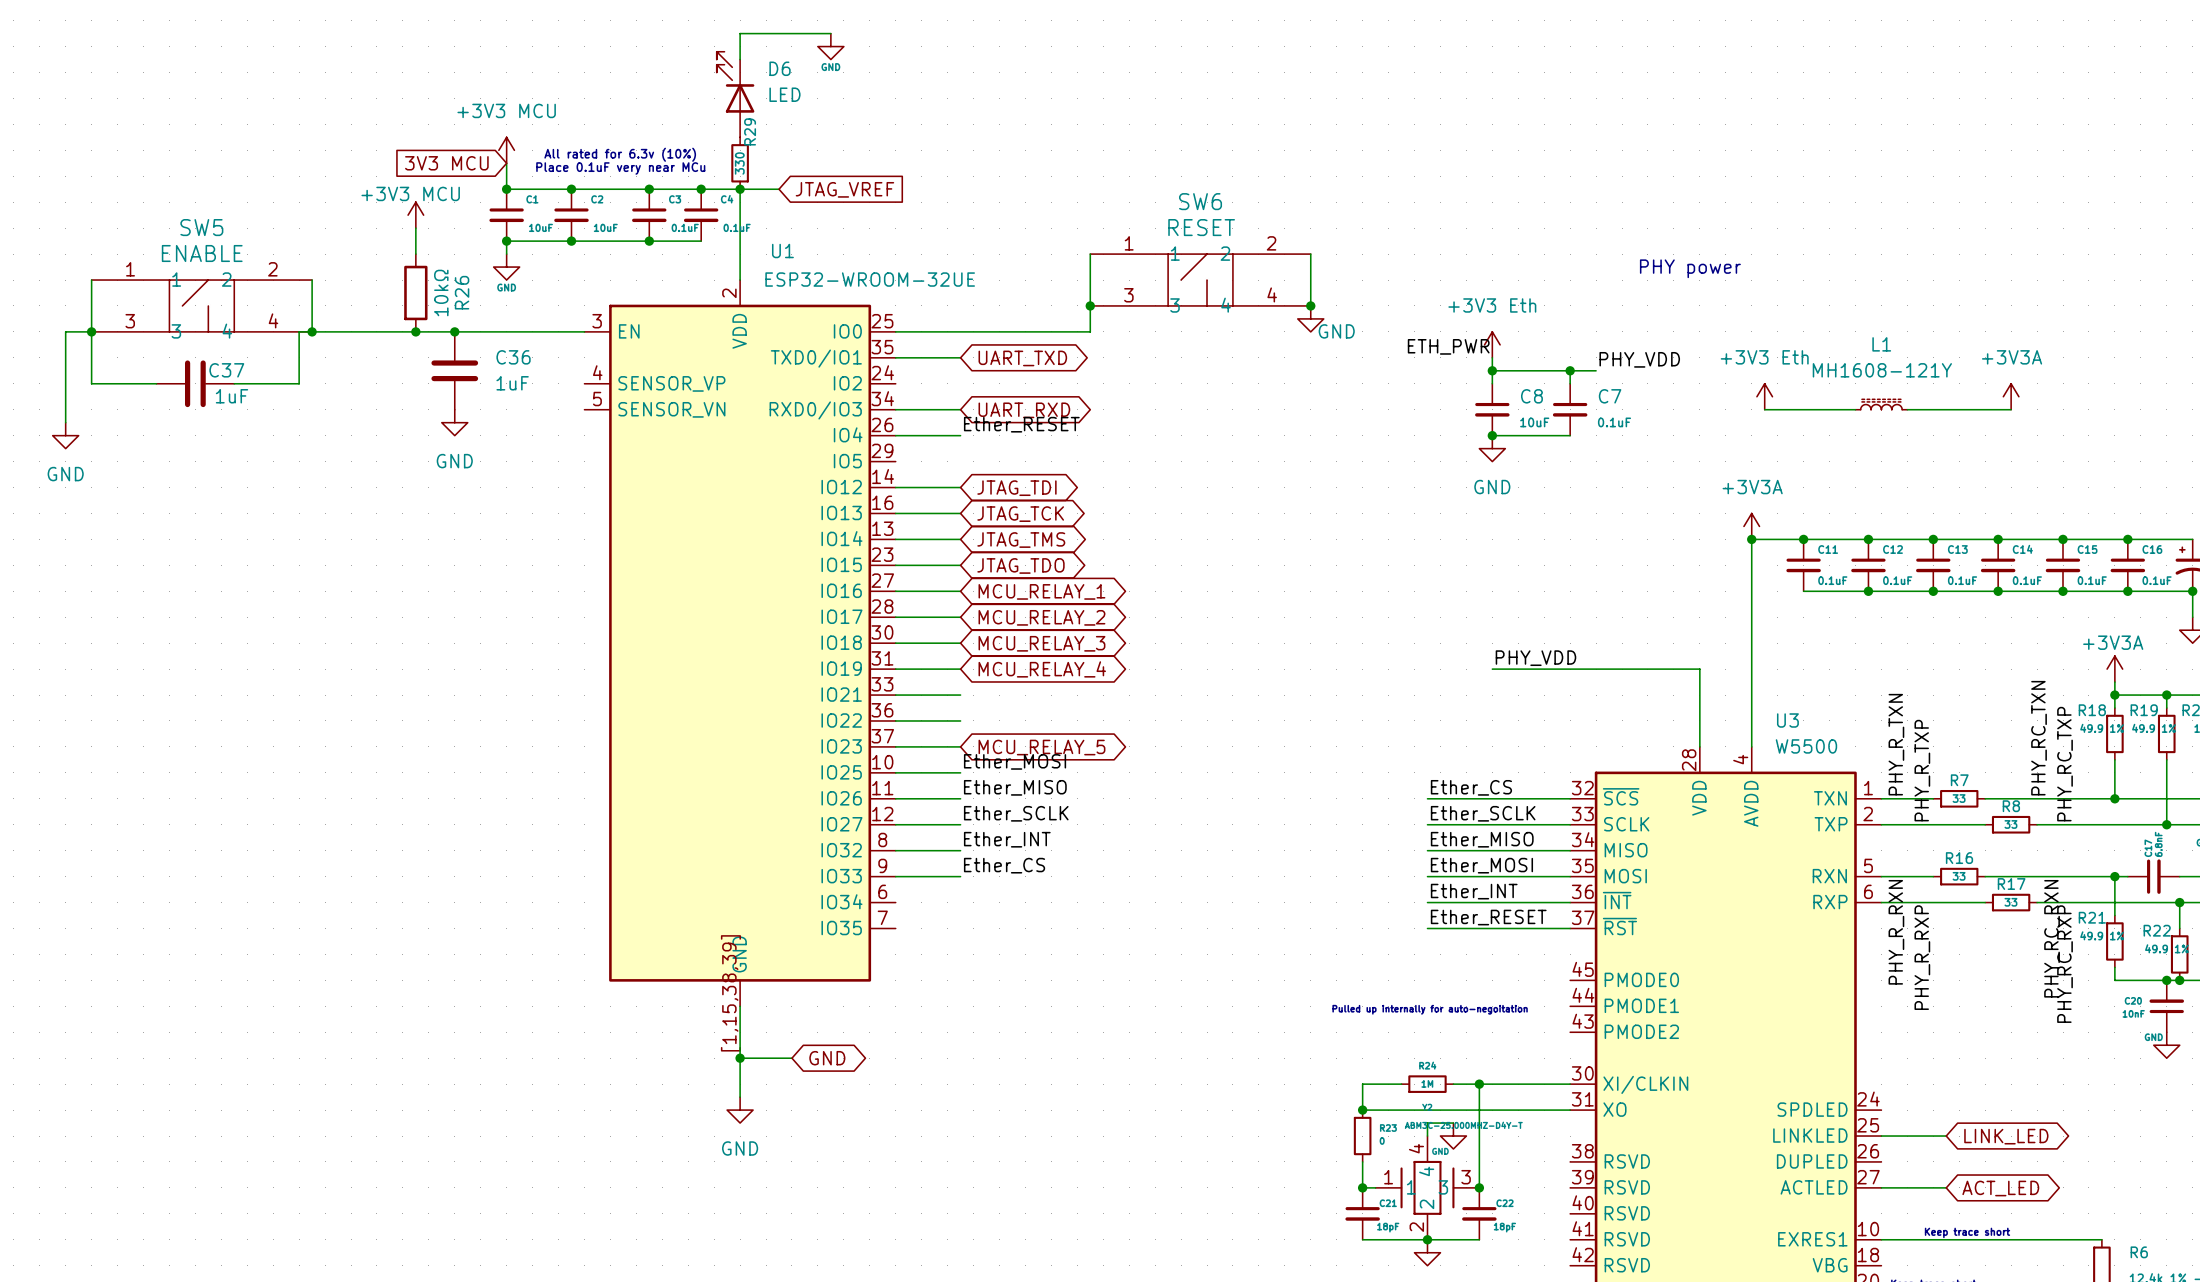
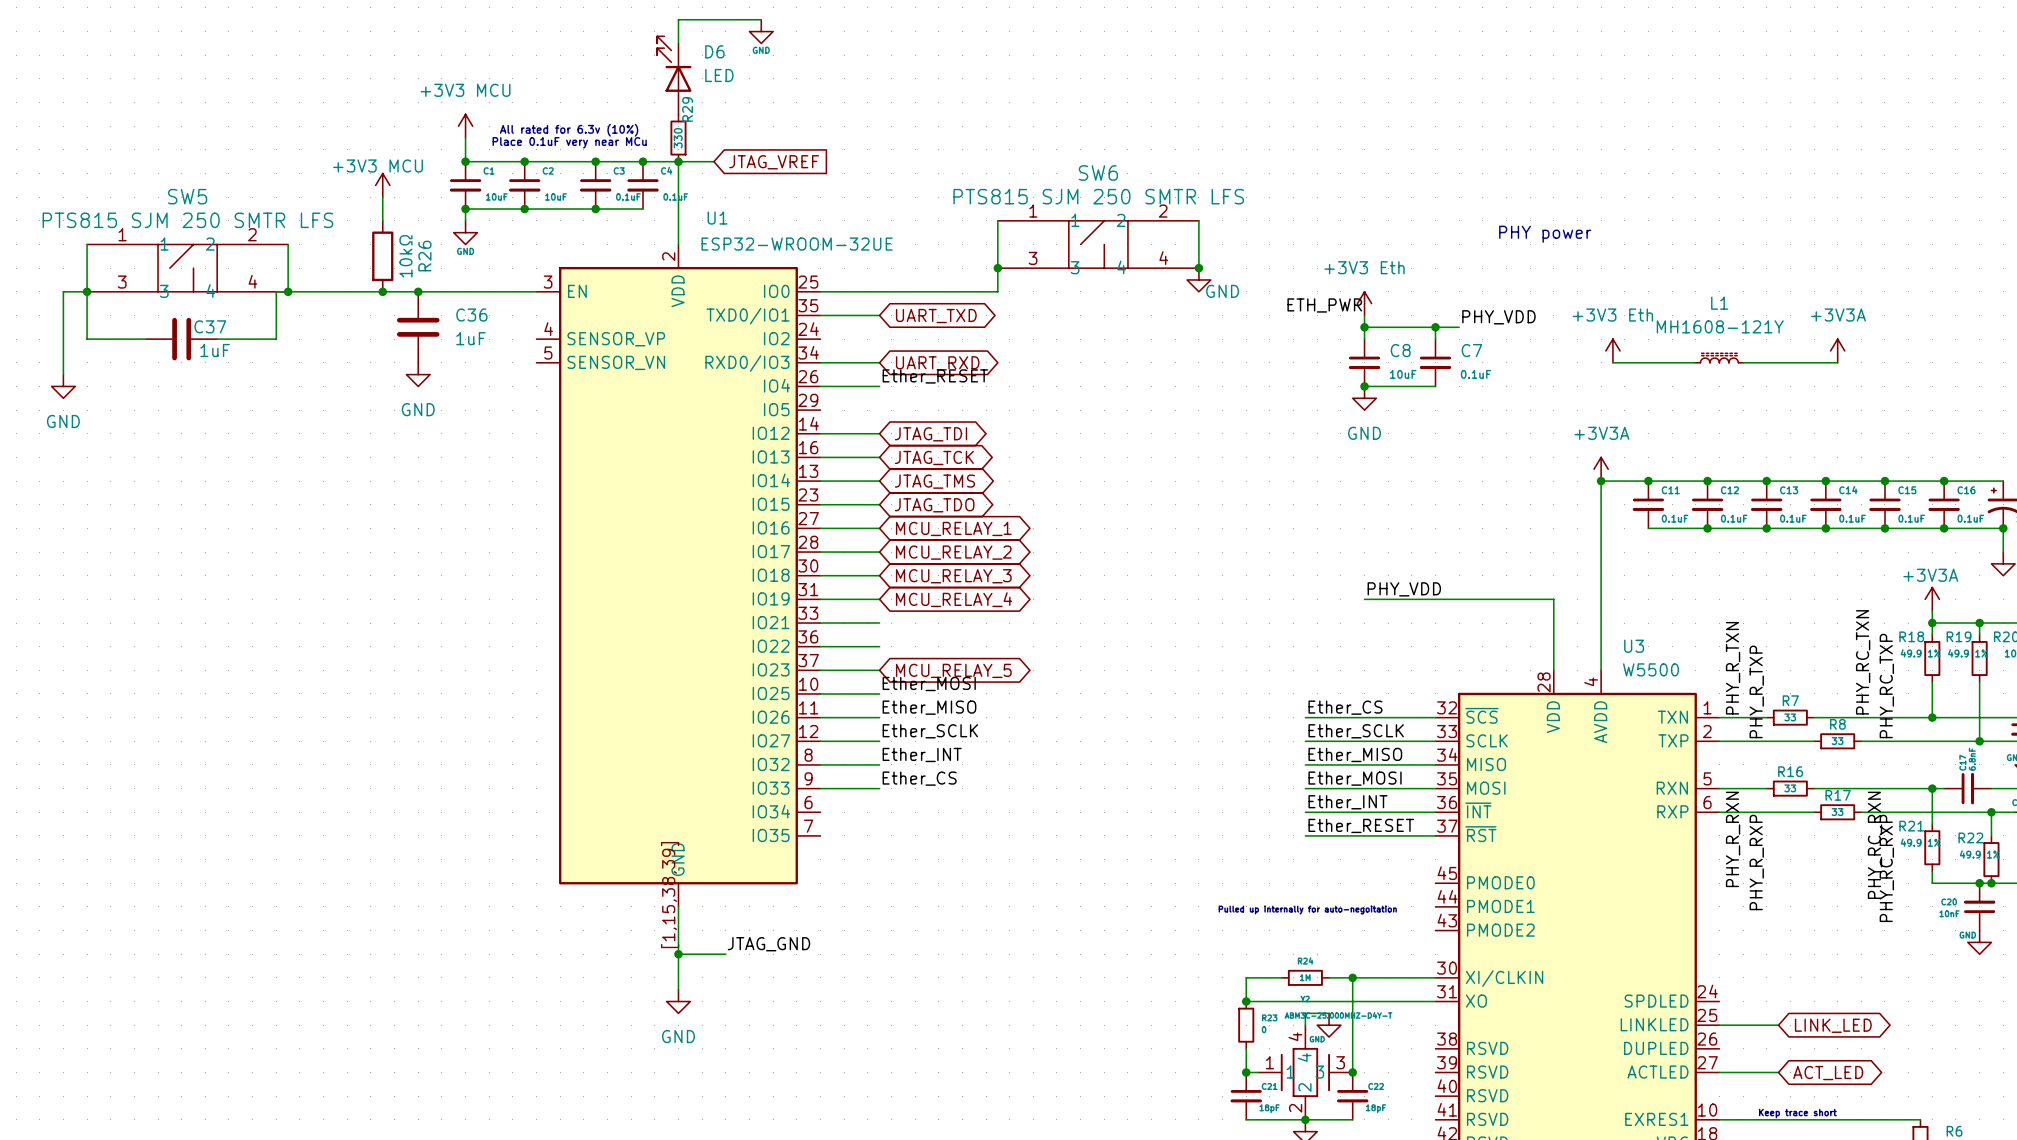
global label: 3V3 MCU (446, 163) -> none
SW6 value: RESET (1201, 227) -> PTS815 SJM 250 SMTR LFS (1098, 196)
SW5 value: ENABLE (202, 253) -> PTS815 SJM 250 SMTR LFS (187, 220)
label: none -> JTAG_GND (768, 944)
global label: GND (827, 1058) -> none

